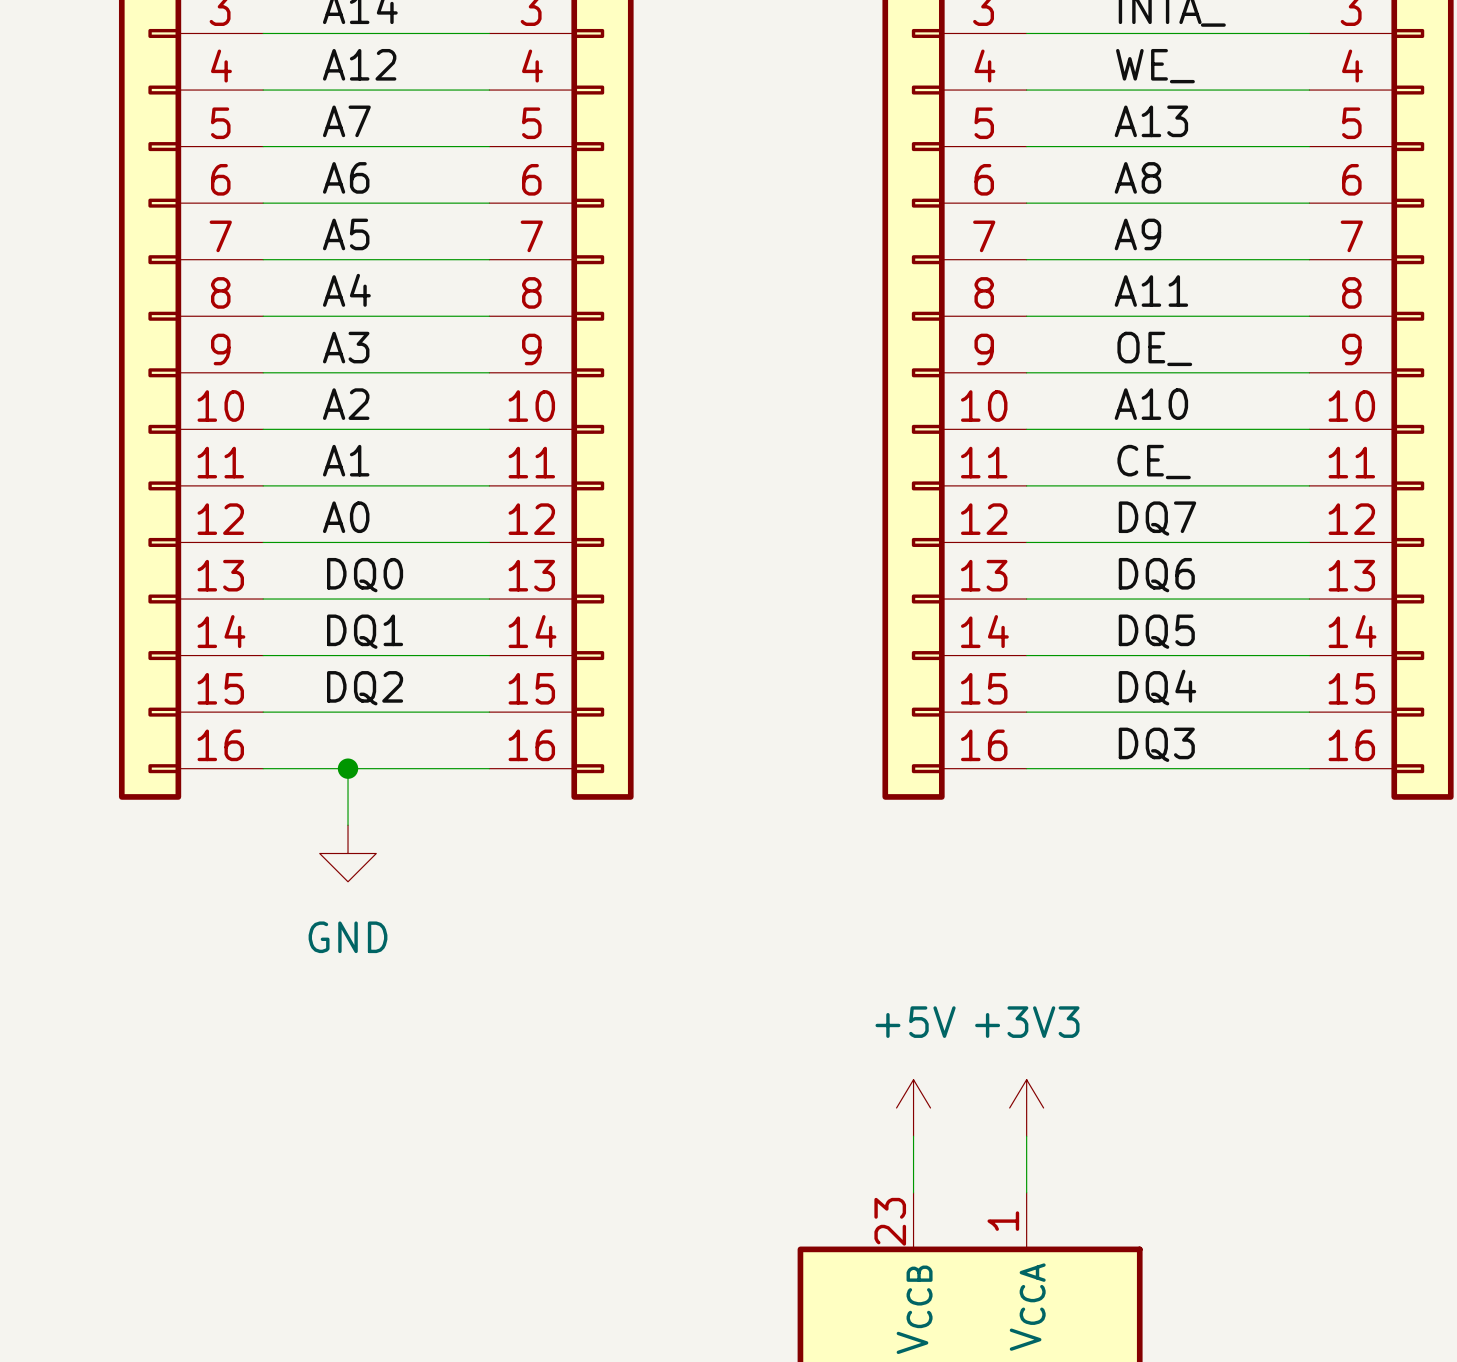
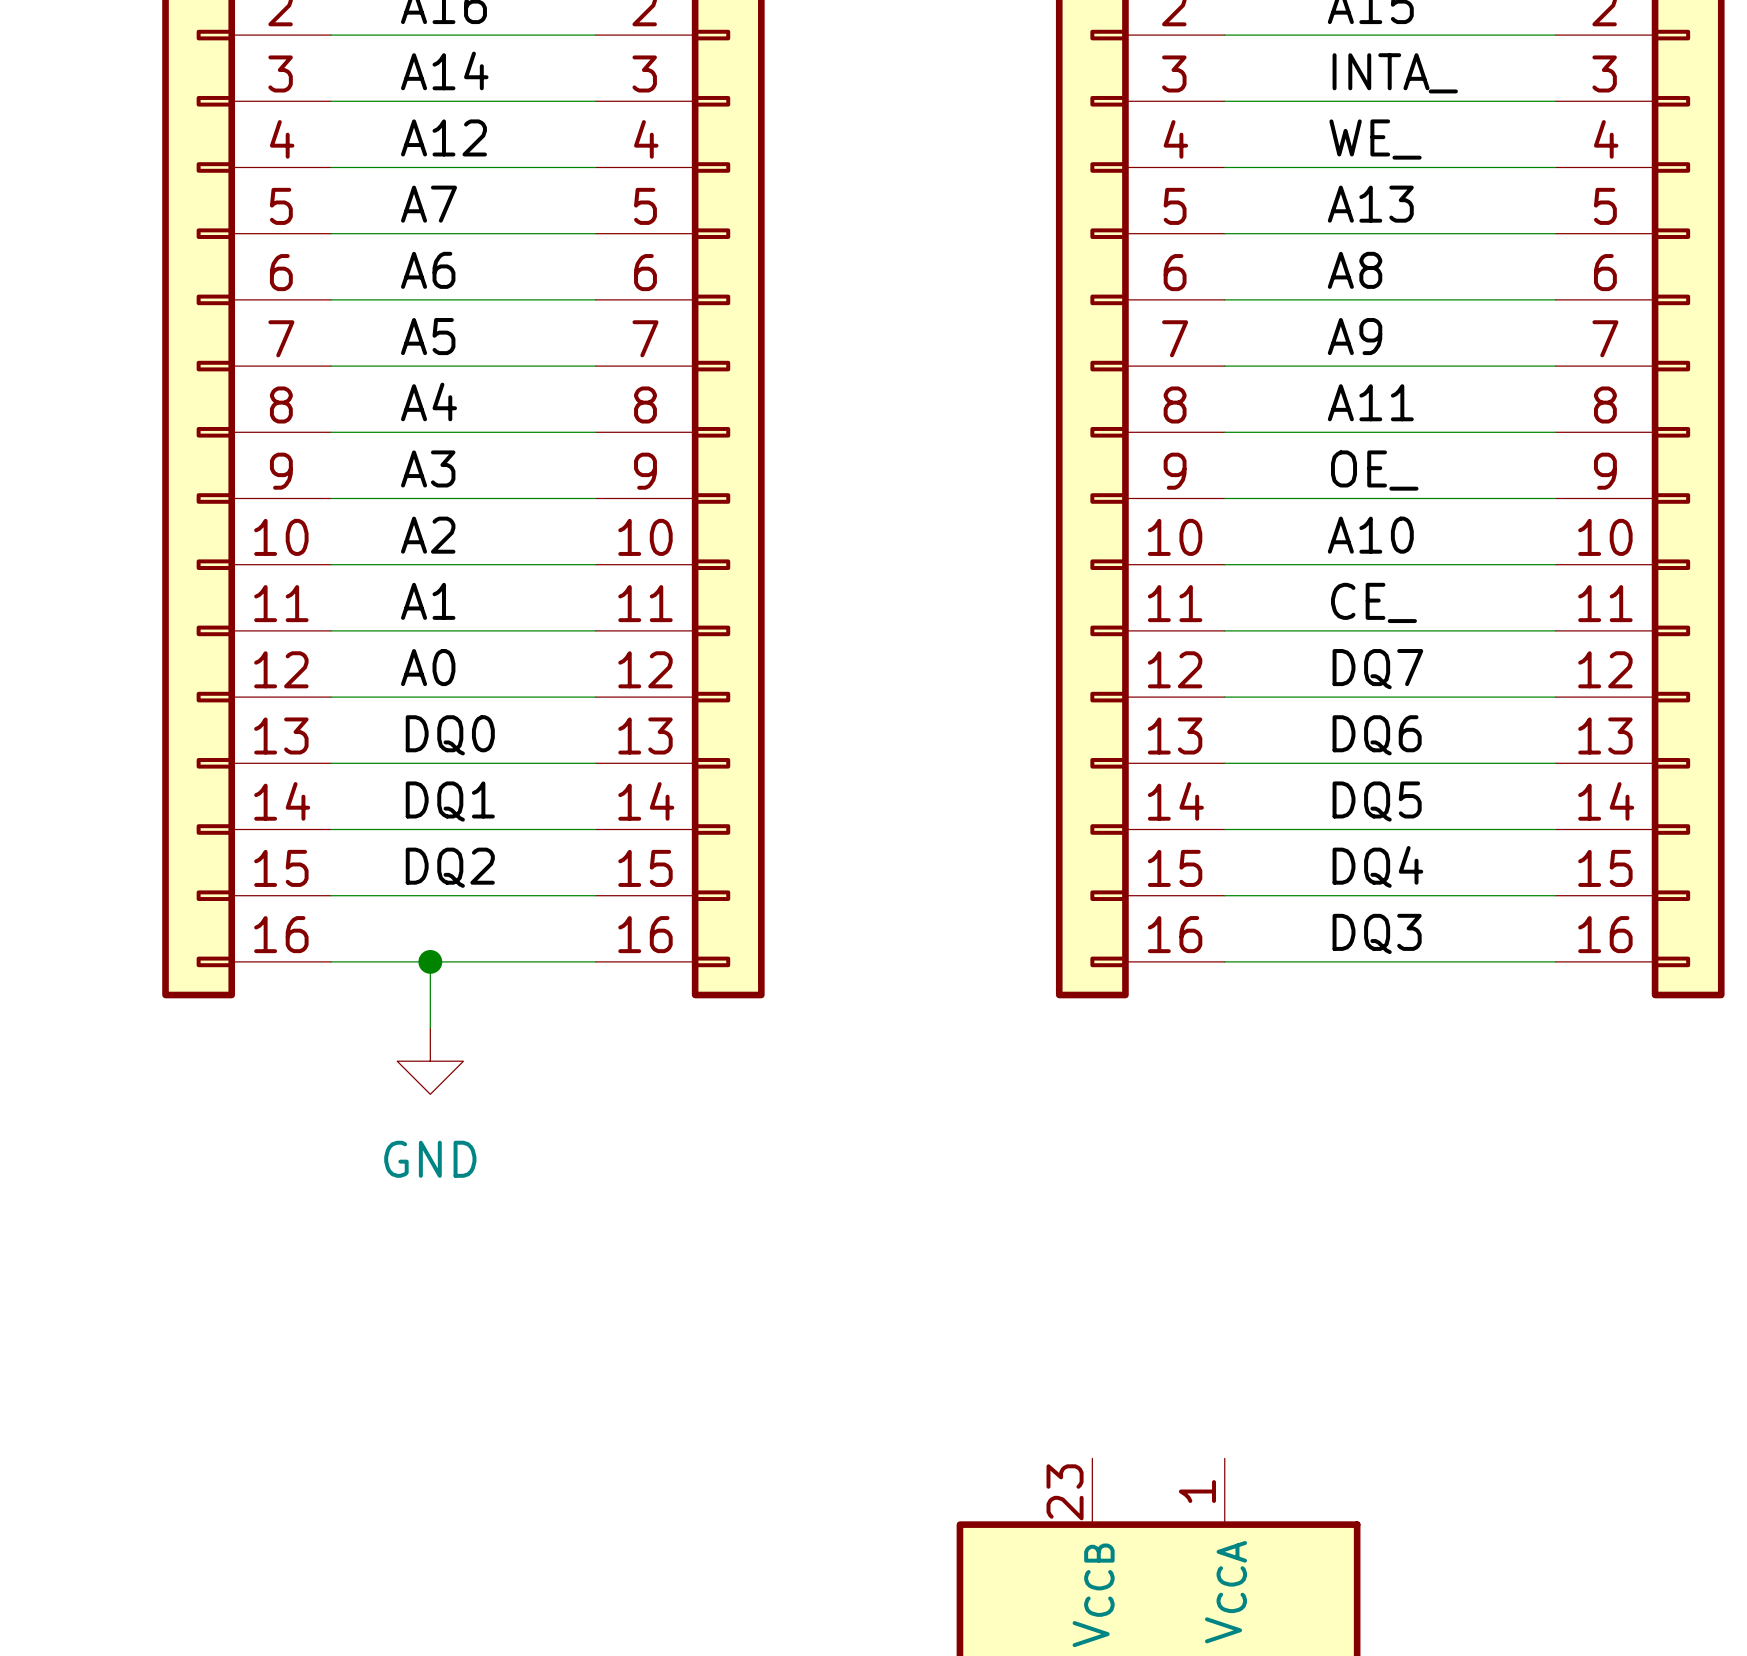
power symbol: +5V (913, 1107) -> none
power symbol: +3V3 (1026, 1107) -> none
wire: (913, 1136) (913, 1192) -> none
wire: (1026, 1136) (1026, 1192) -> none

